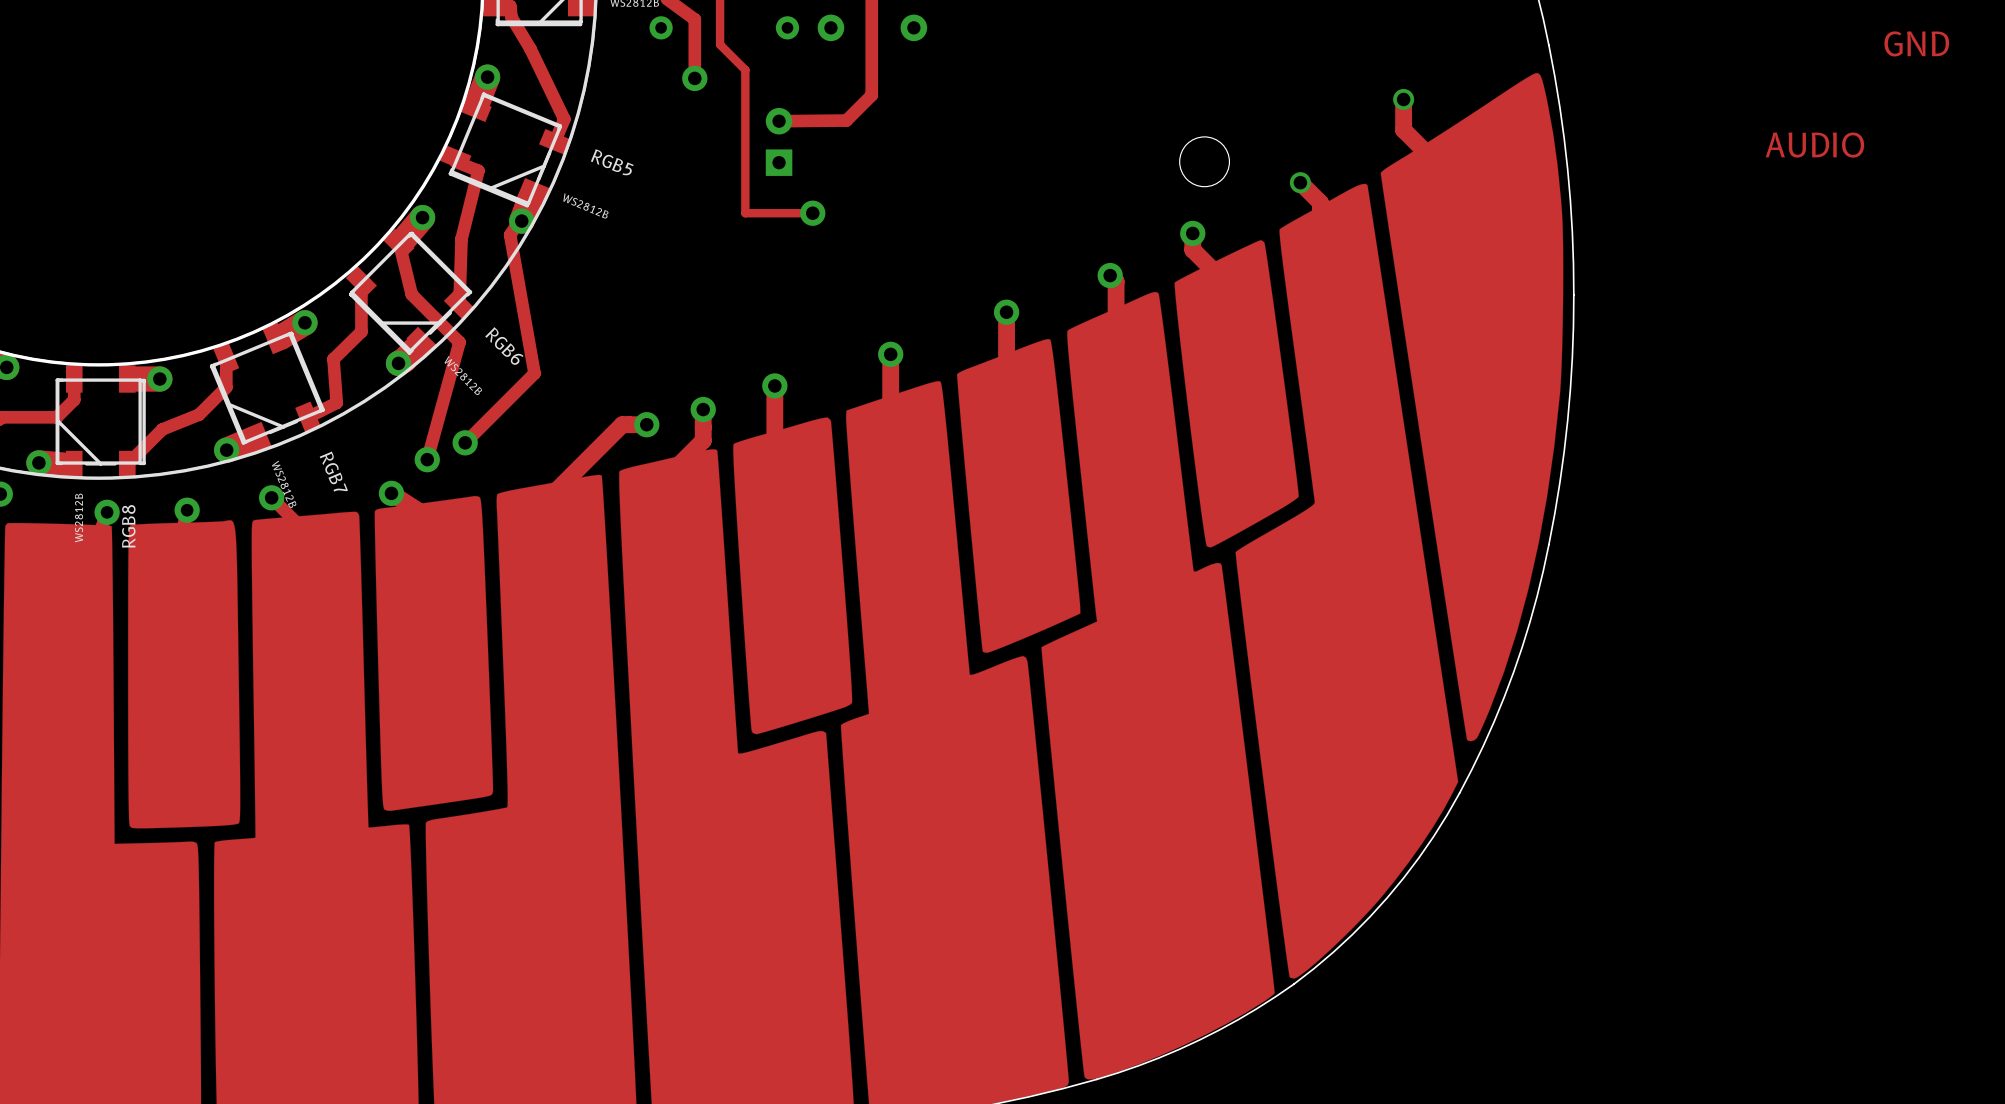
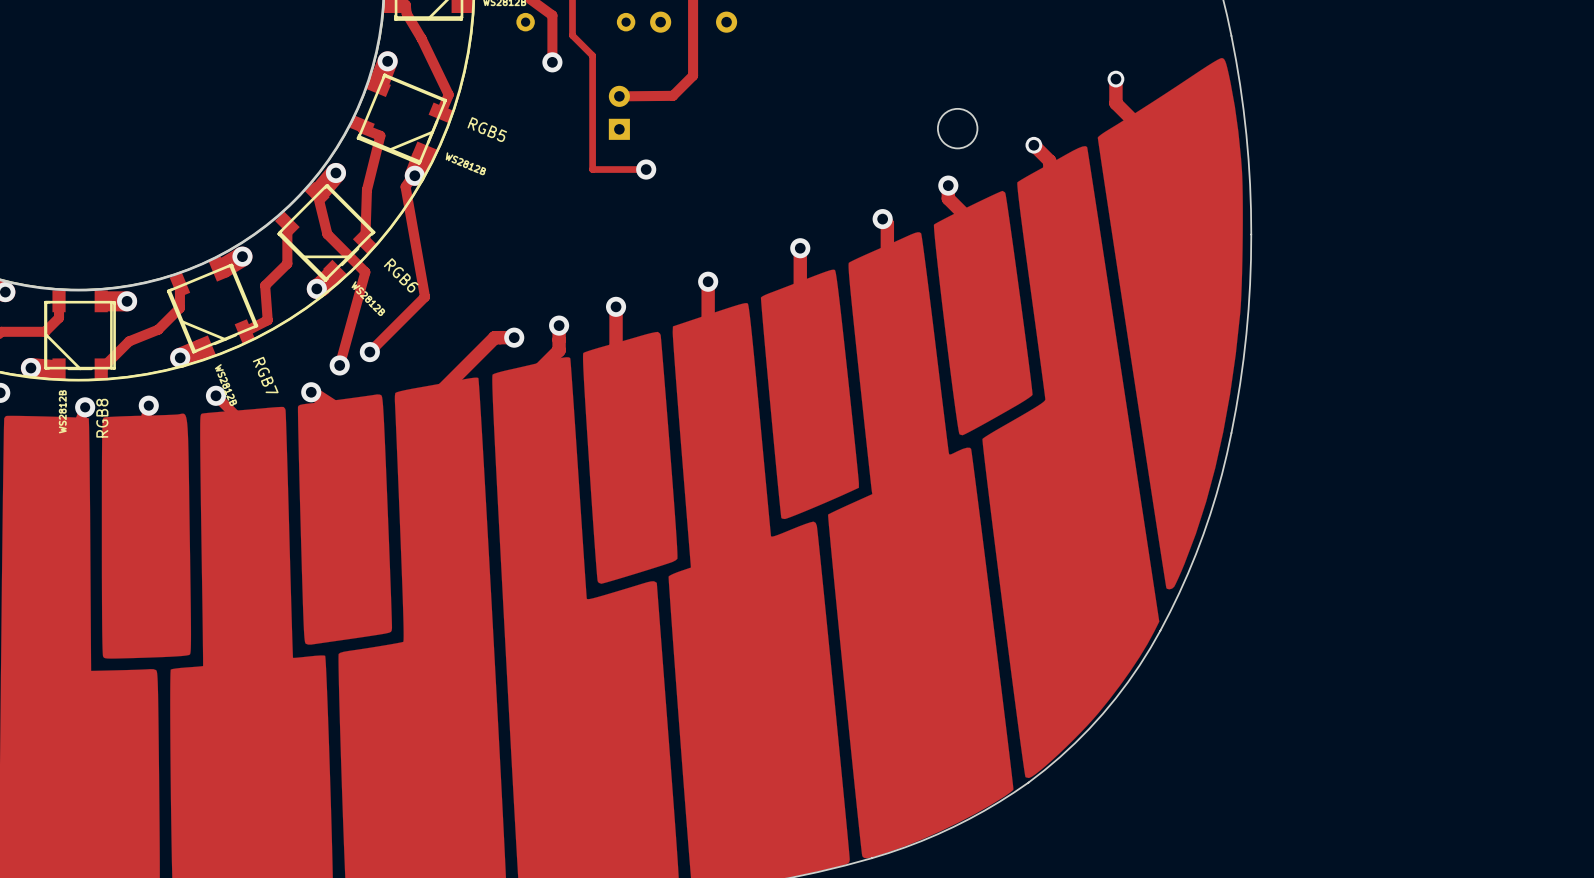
text: GND (1916, 43) -> none
text: AUDIO (1814, 145) -> none

